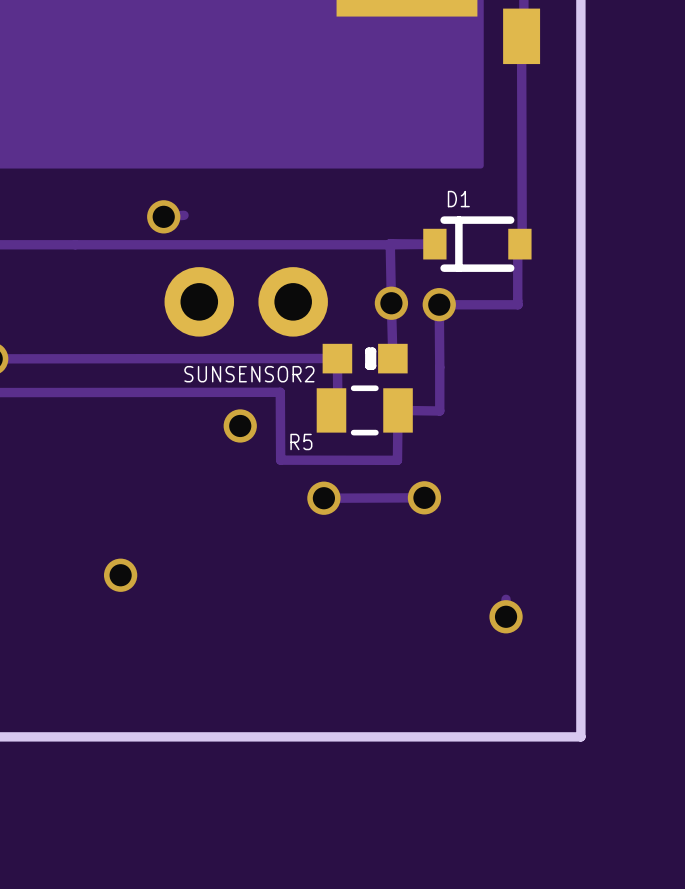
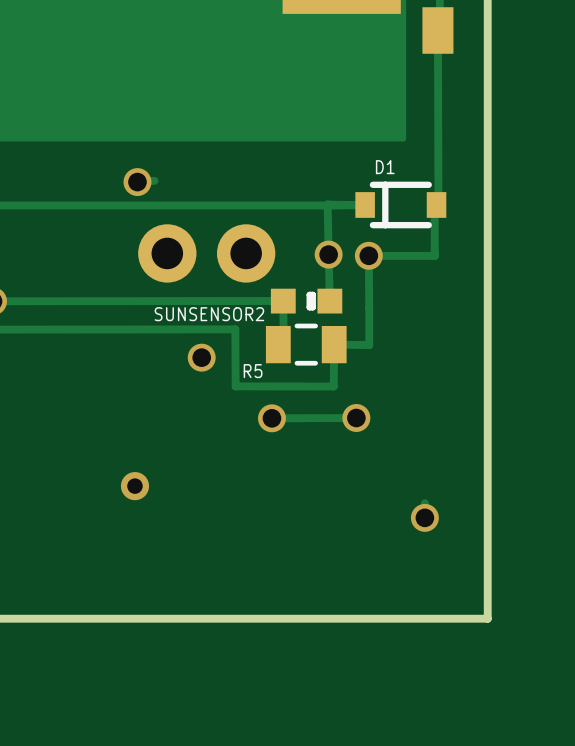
via: (120, 575) -> none
via: none -> (134, 486)

